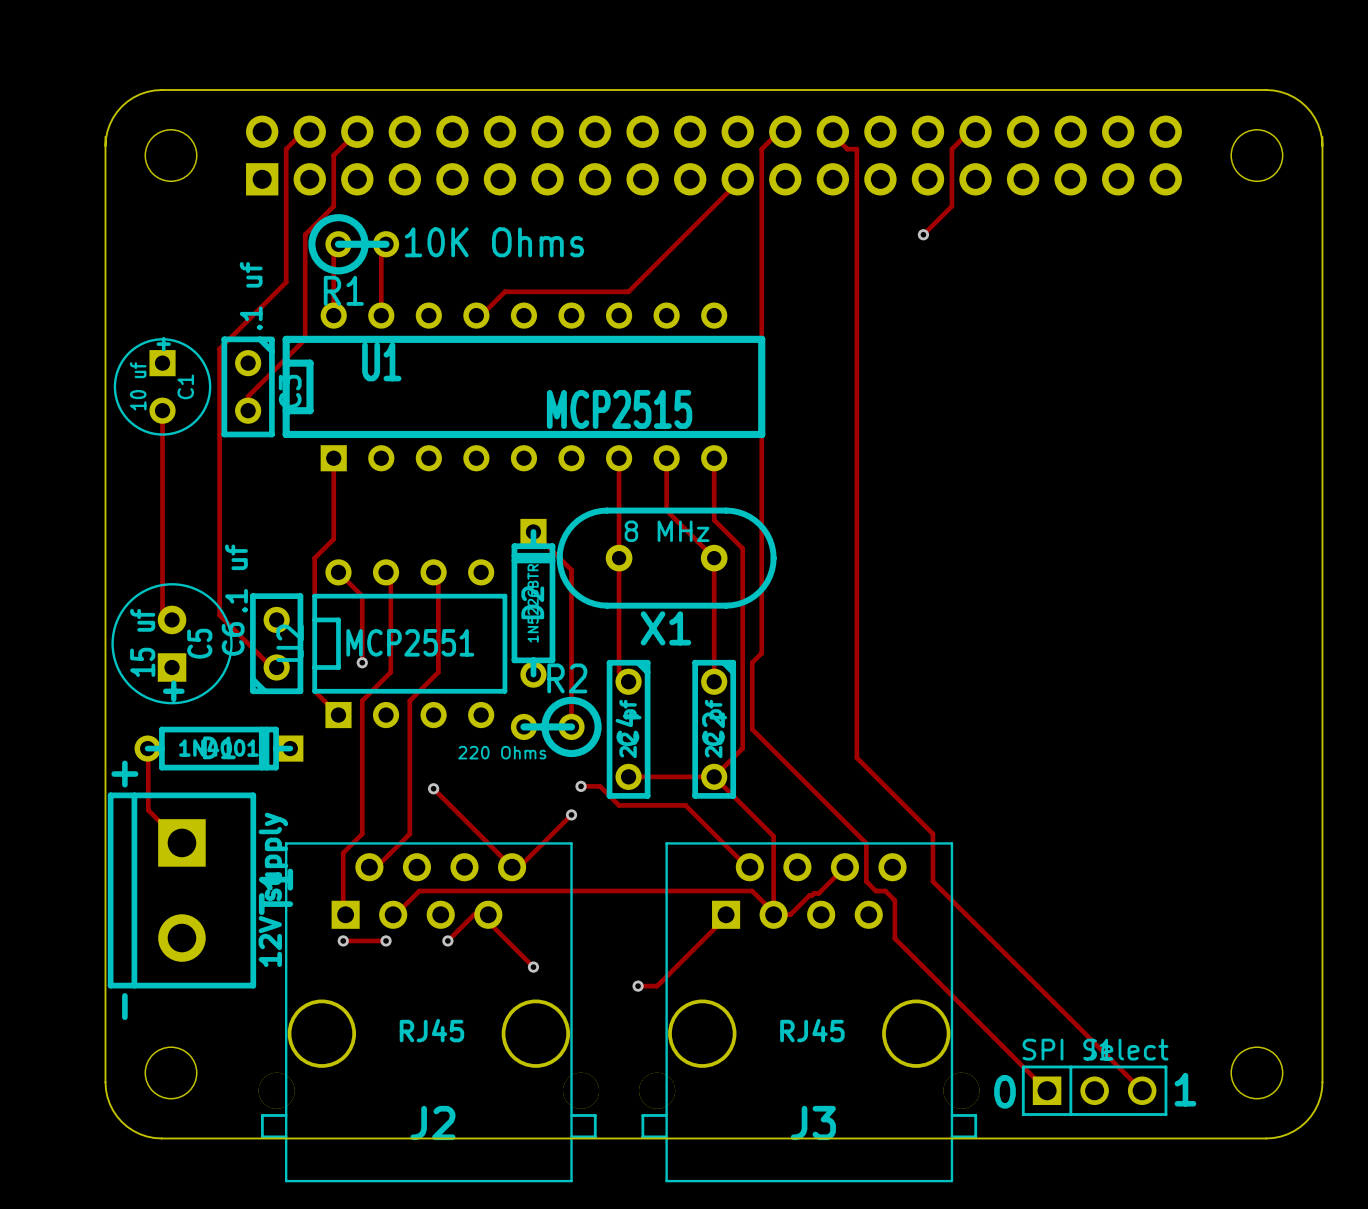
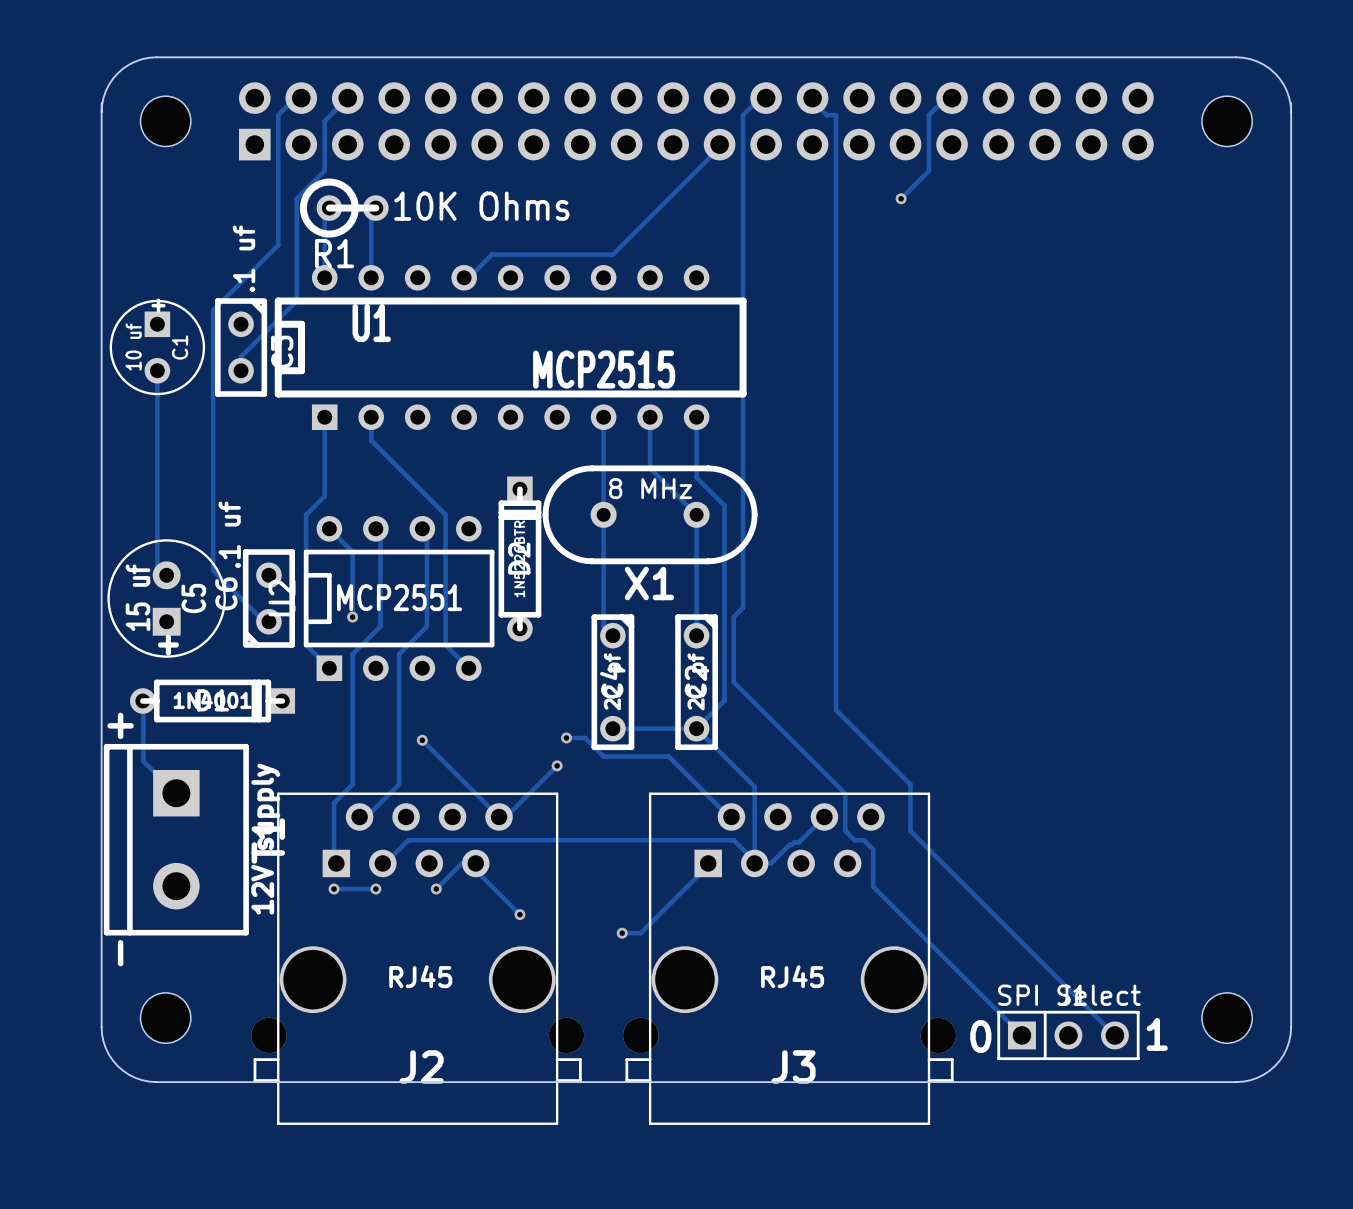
track: none -> (371, 417) (371, 440) (445, 514) (445, 644) (468, 668)
track: (533, 531) (571, 570) (571, 726) -> none
R2: 220 Ohms (556, 726) -> none

